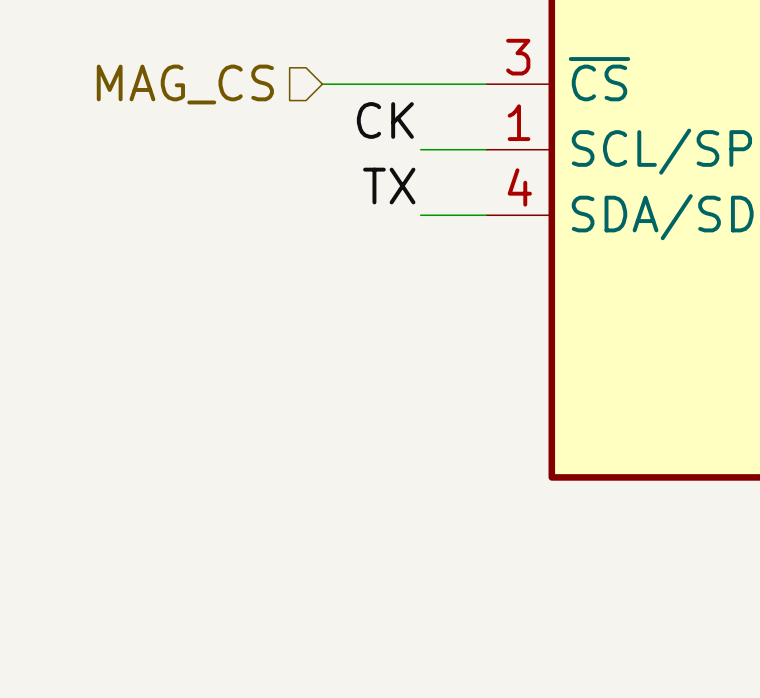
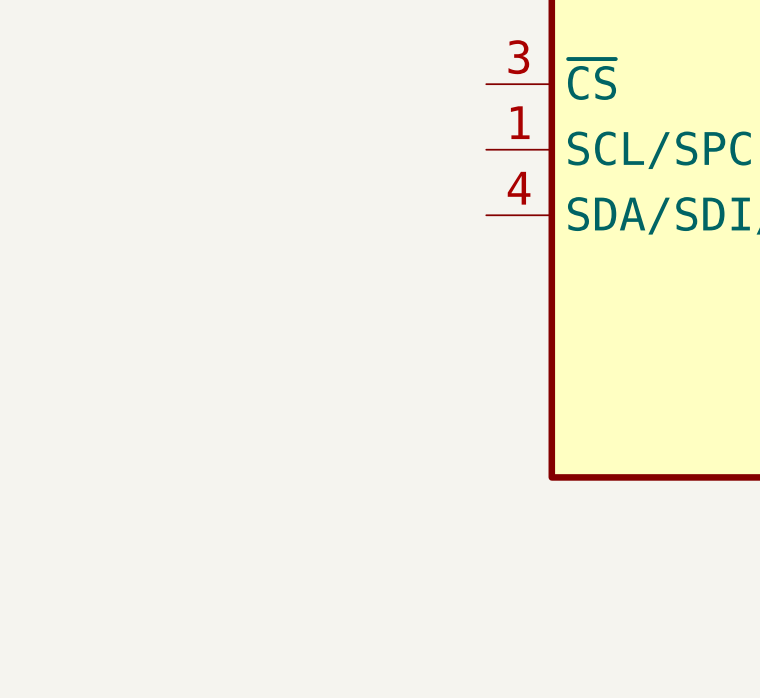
hierarchical label: MAG_CS (185, 84) -> none
wire: (322, 84) (486, 84) -> none
label: CK (385, 120) -> none
wire: (420, 149) (486, 149) -> none
label: TX (389, 186) -> none
wire: (420, 215) (486, 215) -> none

